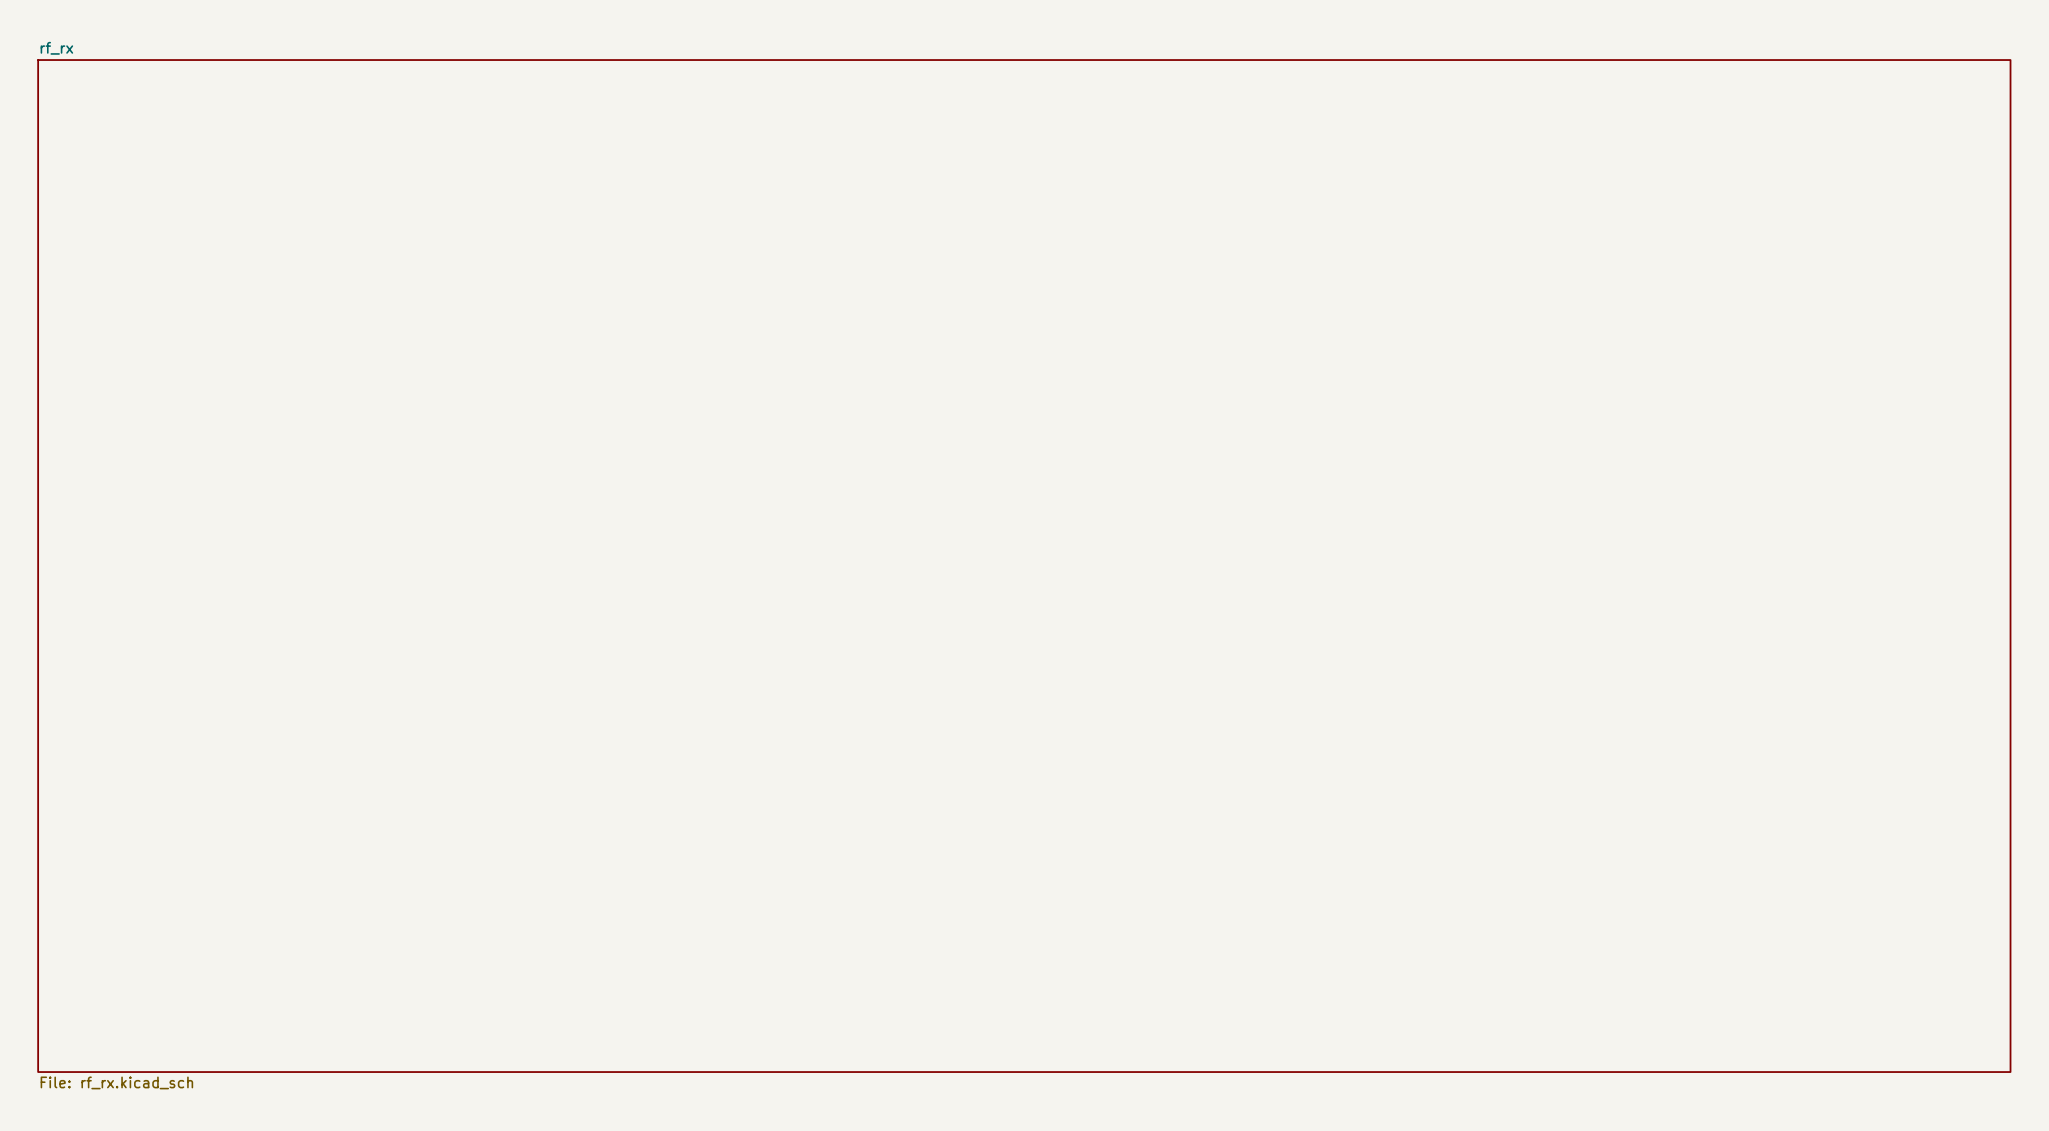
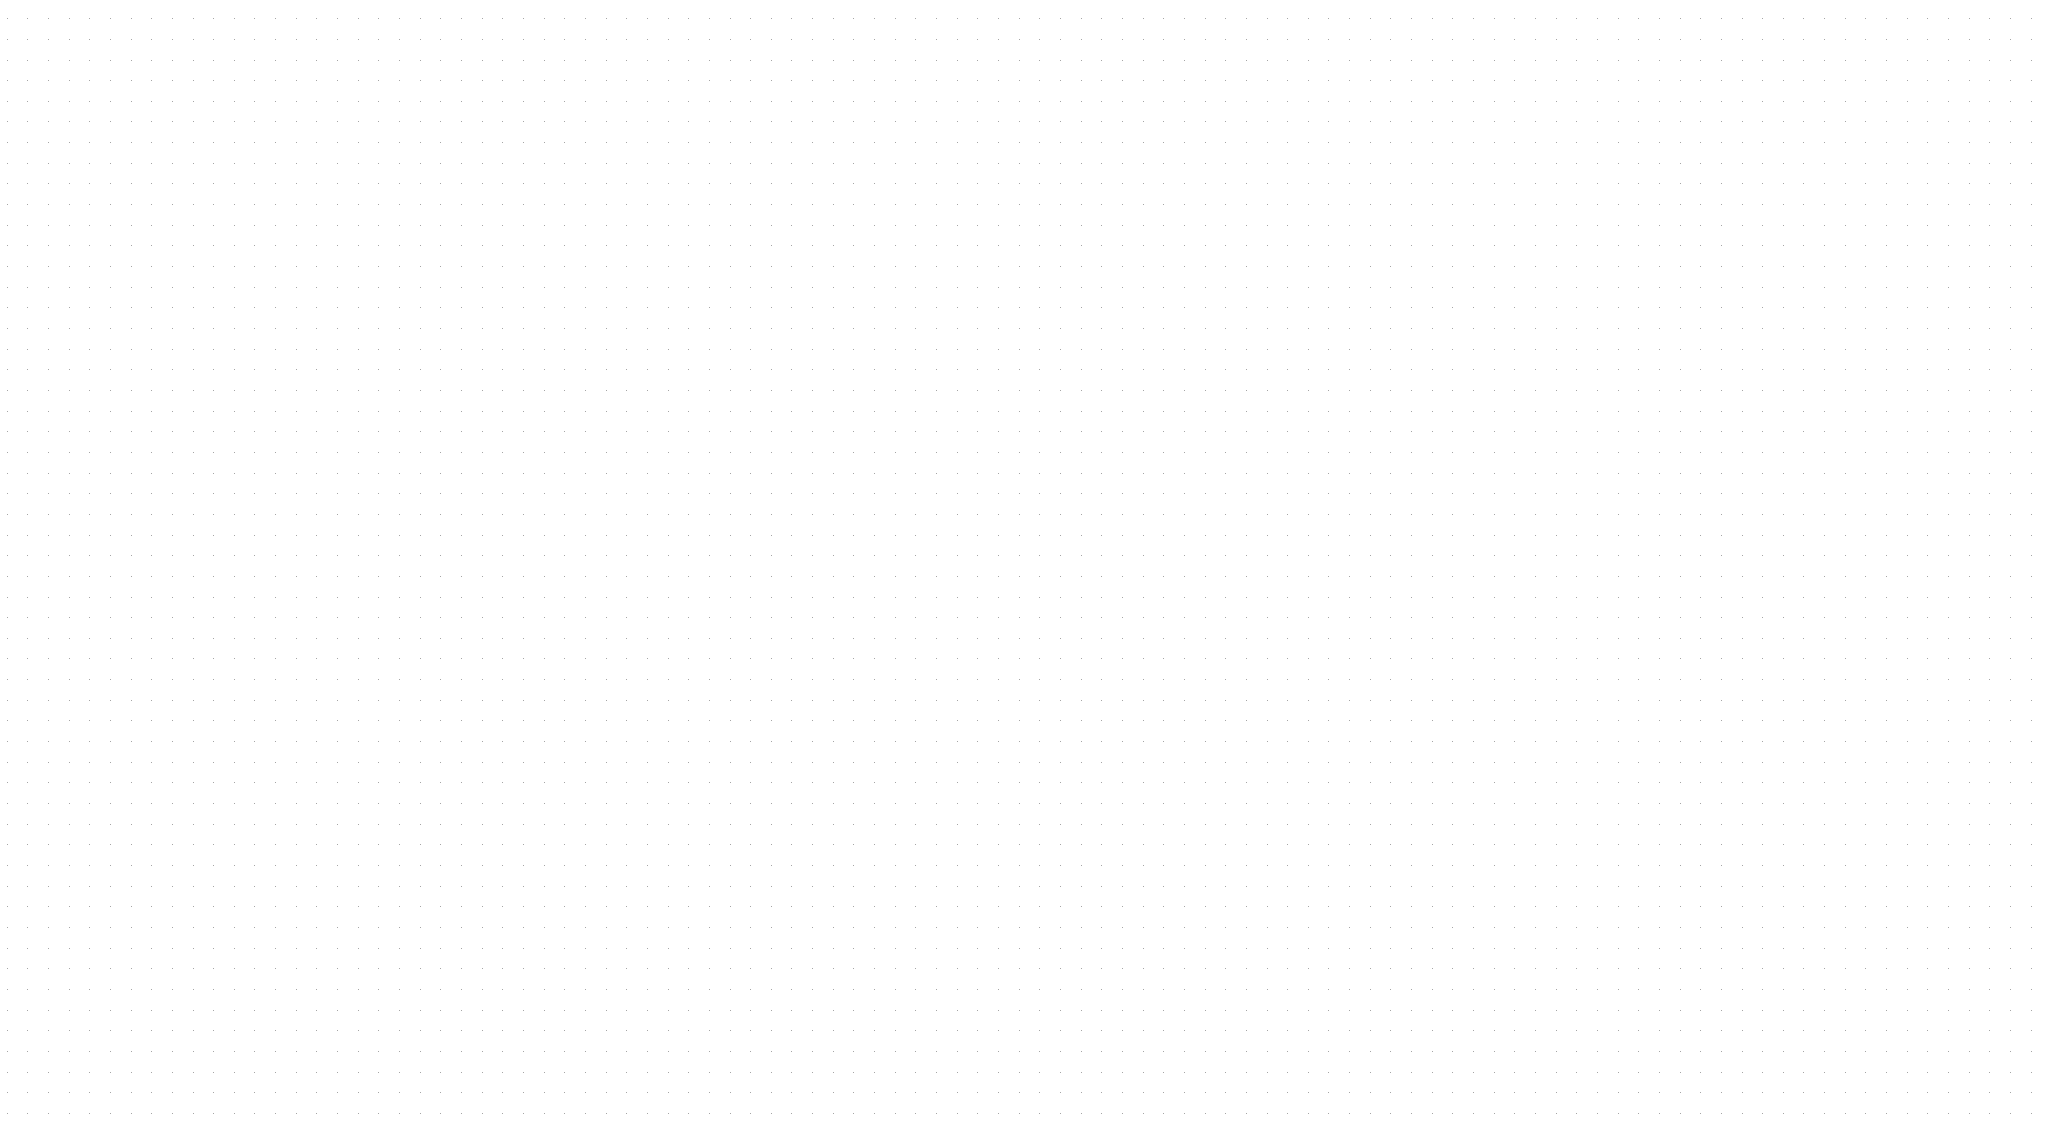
sheet rf_rx: File: rf_rx.kicad_sch (1024, 566) -> none

